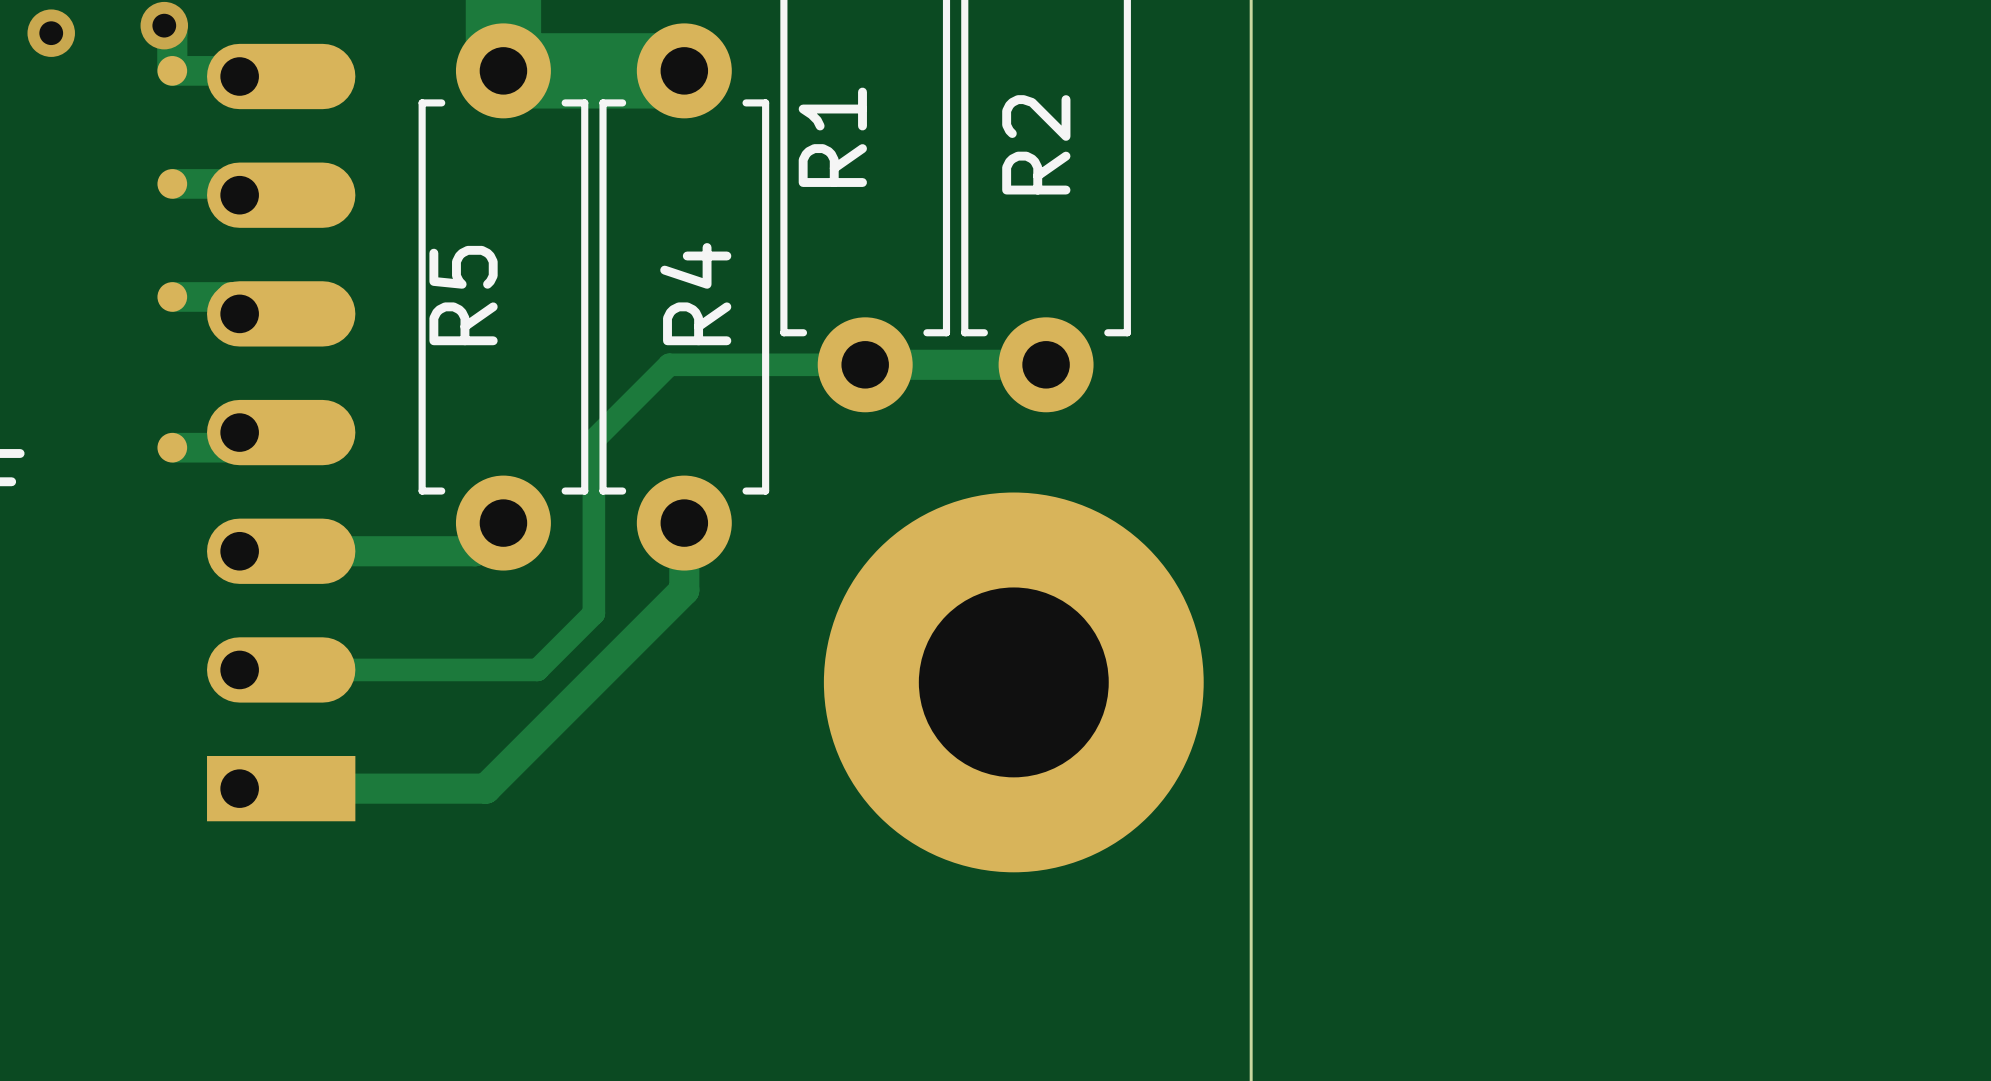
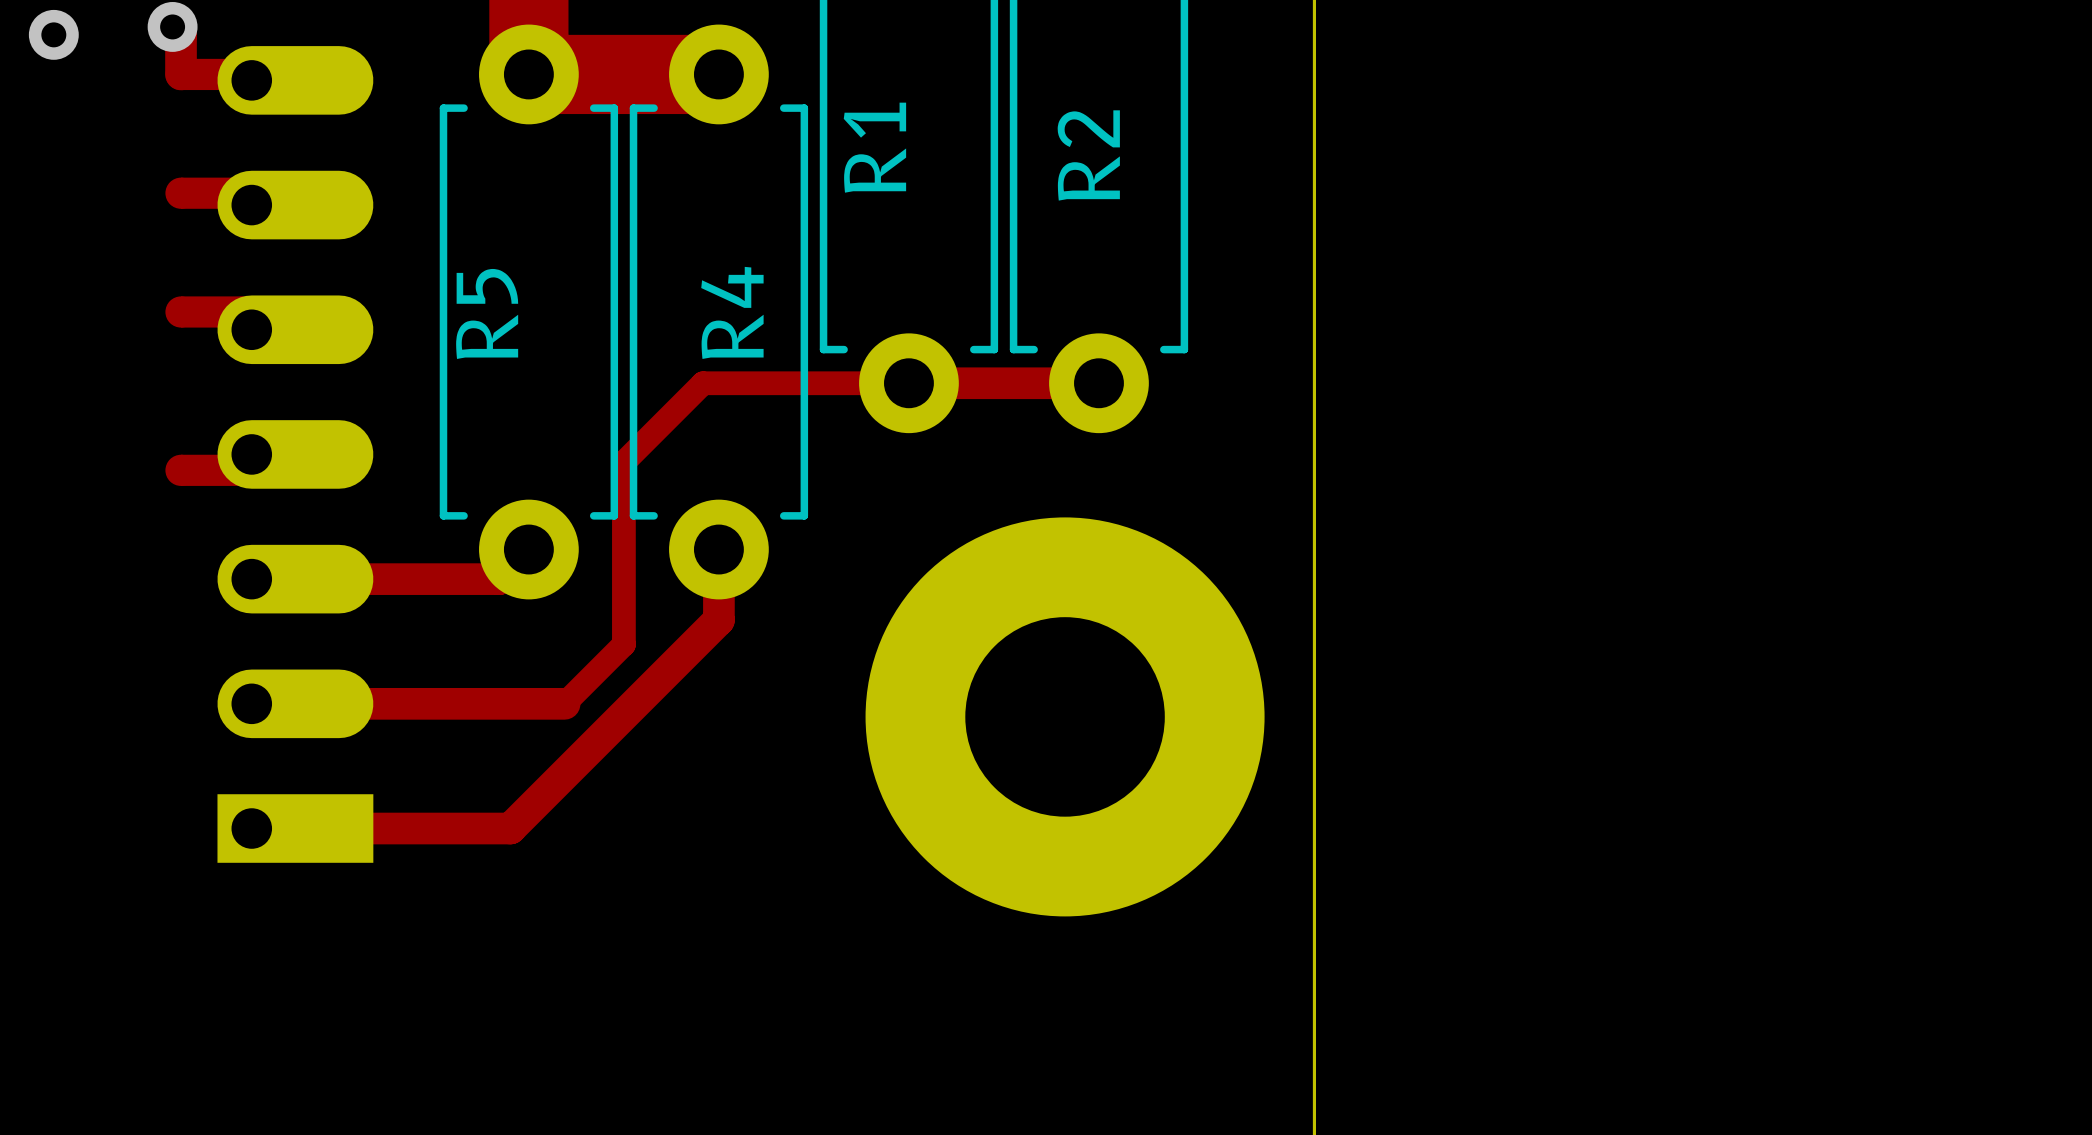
track width: thin (239, 669) (537, 669) -> thick (251, 703) (564, 703)

